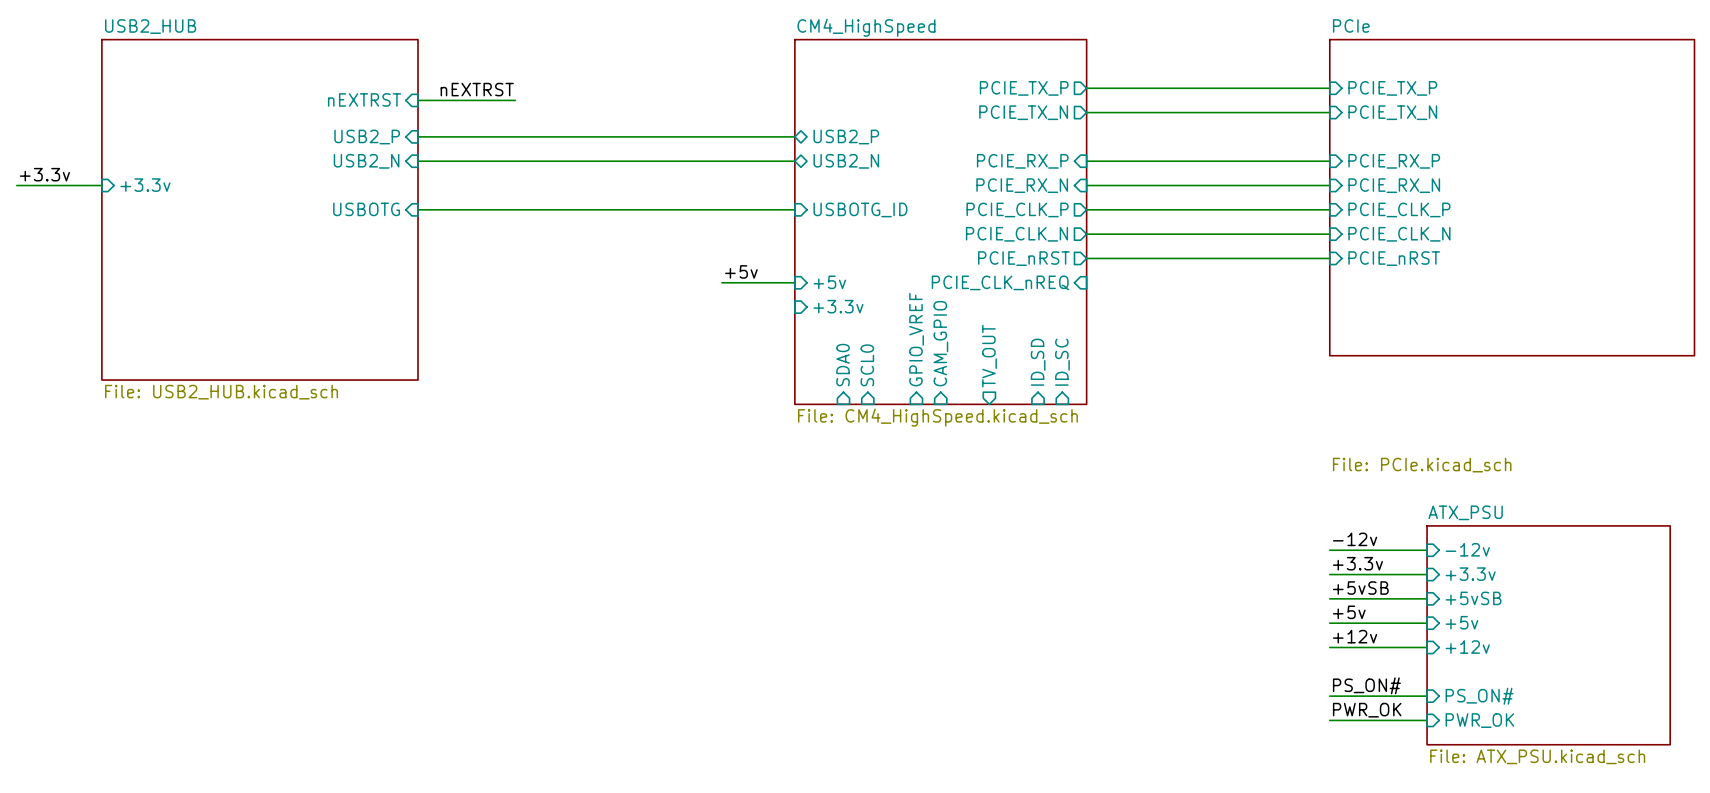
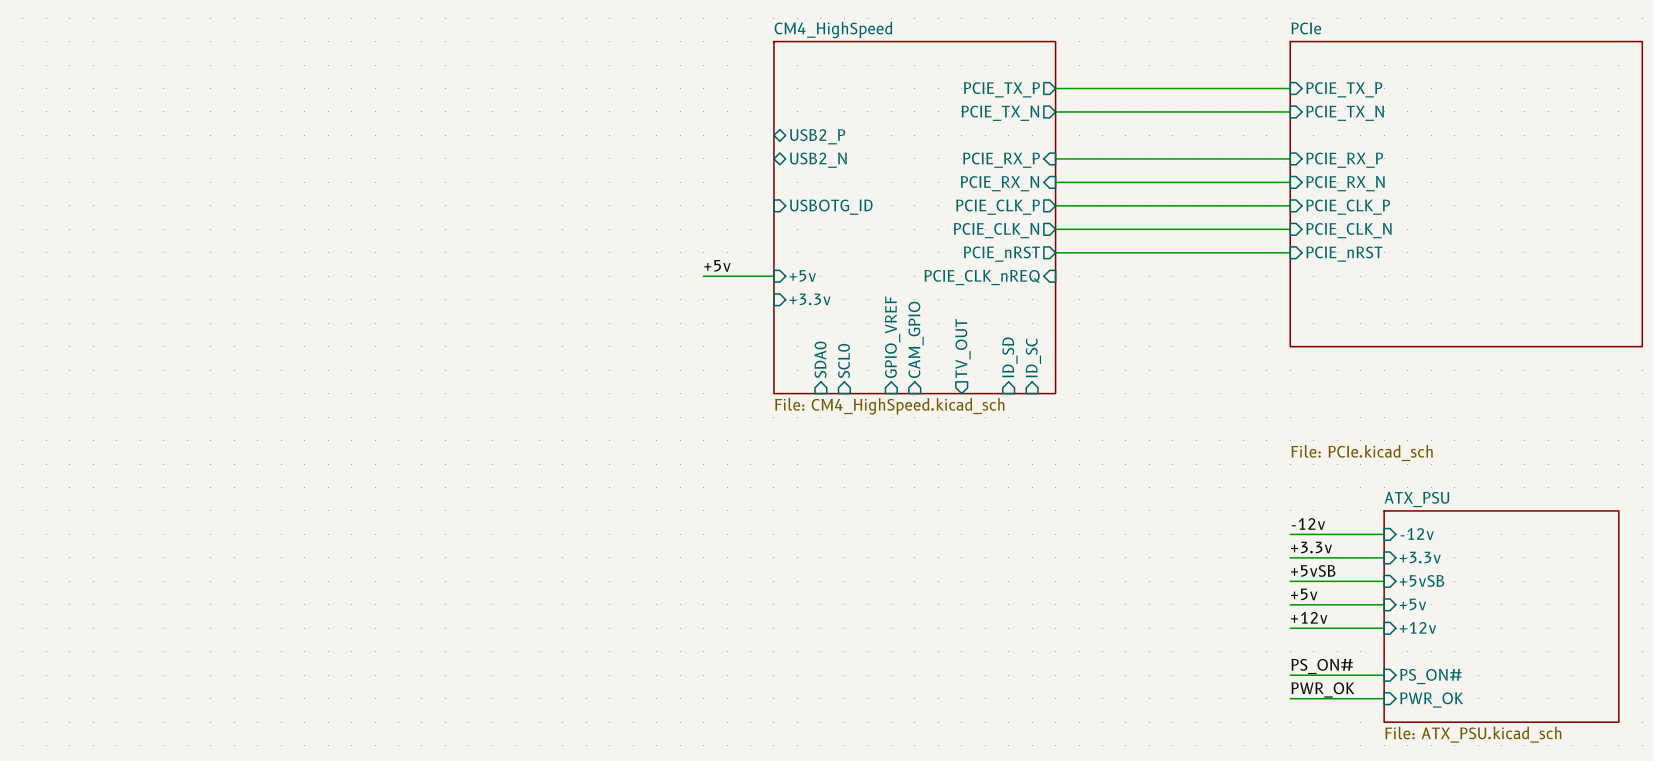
label: nEXTRST (477, 89) -> none
sheet pin: nEXTRST (364, 99) -> none
wire: (417, 100) (515, 100) -> none
wire: (417, 136) (794, 136) -> none
sheet pin: USB2_P (367, 137) -> none
sheet pin: USB2_N (366, 161) -> none
wire: (417, 161) (794, 161) -> none
label: +3.3v (44, 174) -> none
wire: (16, 185) (101, 185) -> none
sheet pin: +3.3v (145, 185) -> none
sheet USB2_HUB: File: USB2_HUB.kicad_sch (259, 209) -> none
sheet pin: USBOTG (366, 209) -> none
wire: (417, 209) (794, 209) -> none

